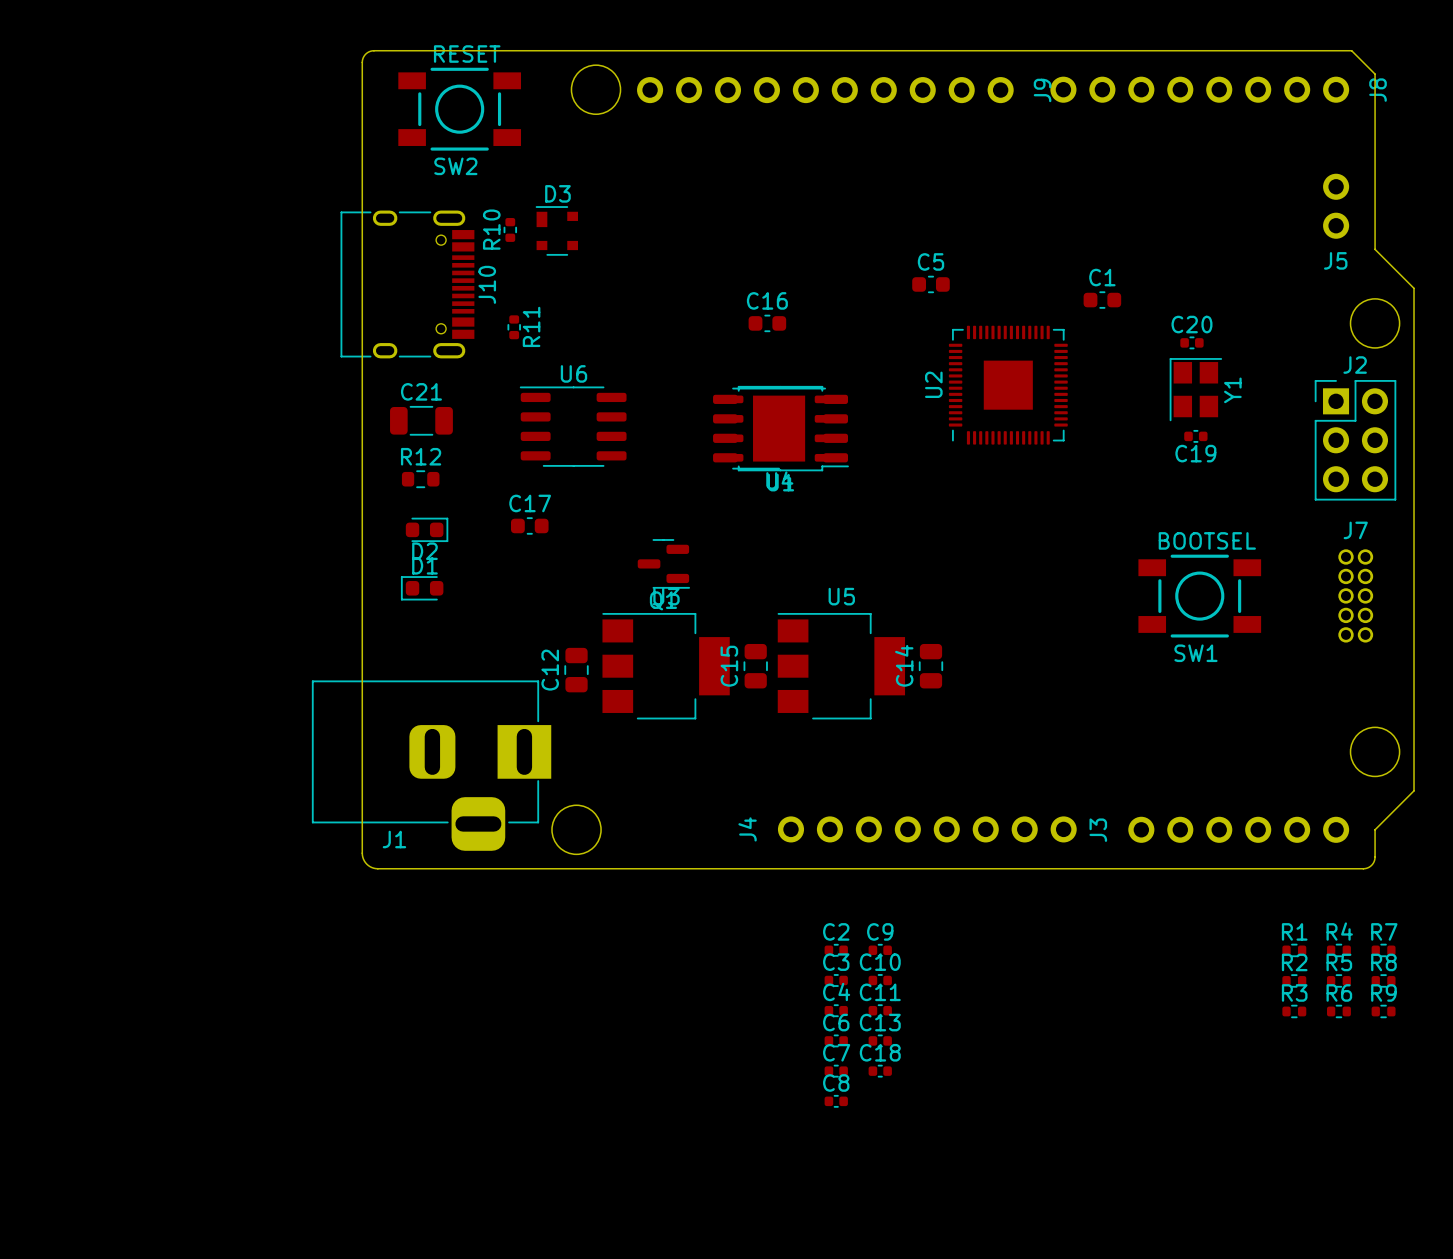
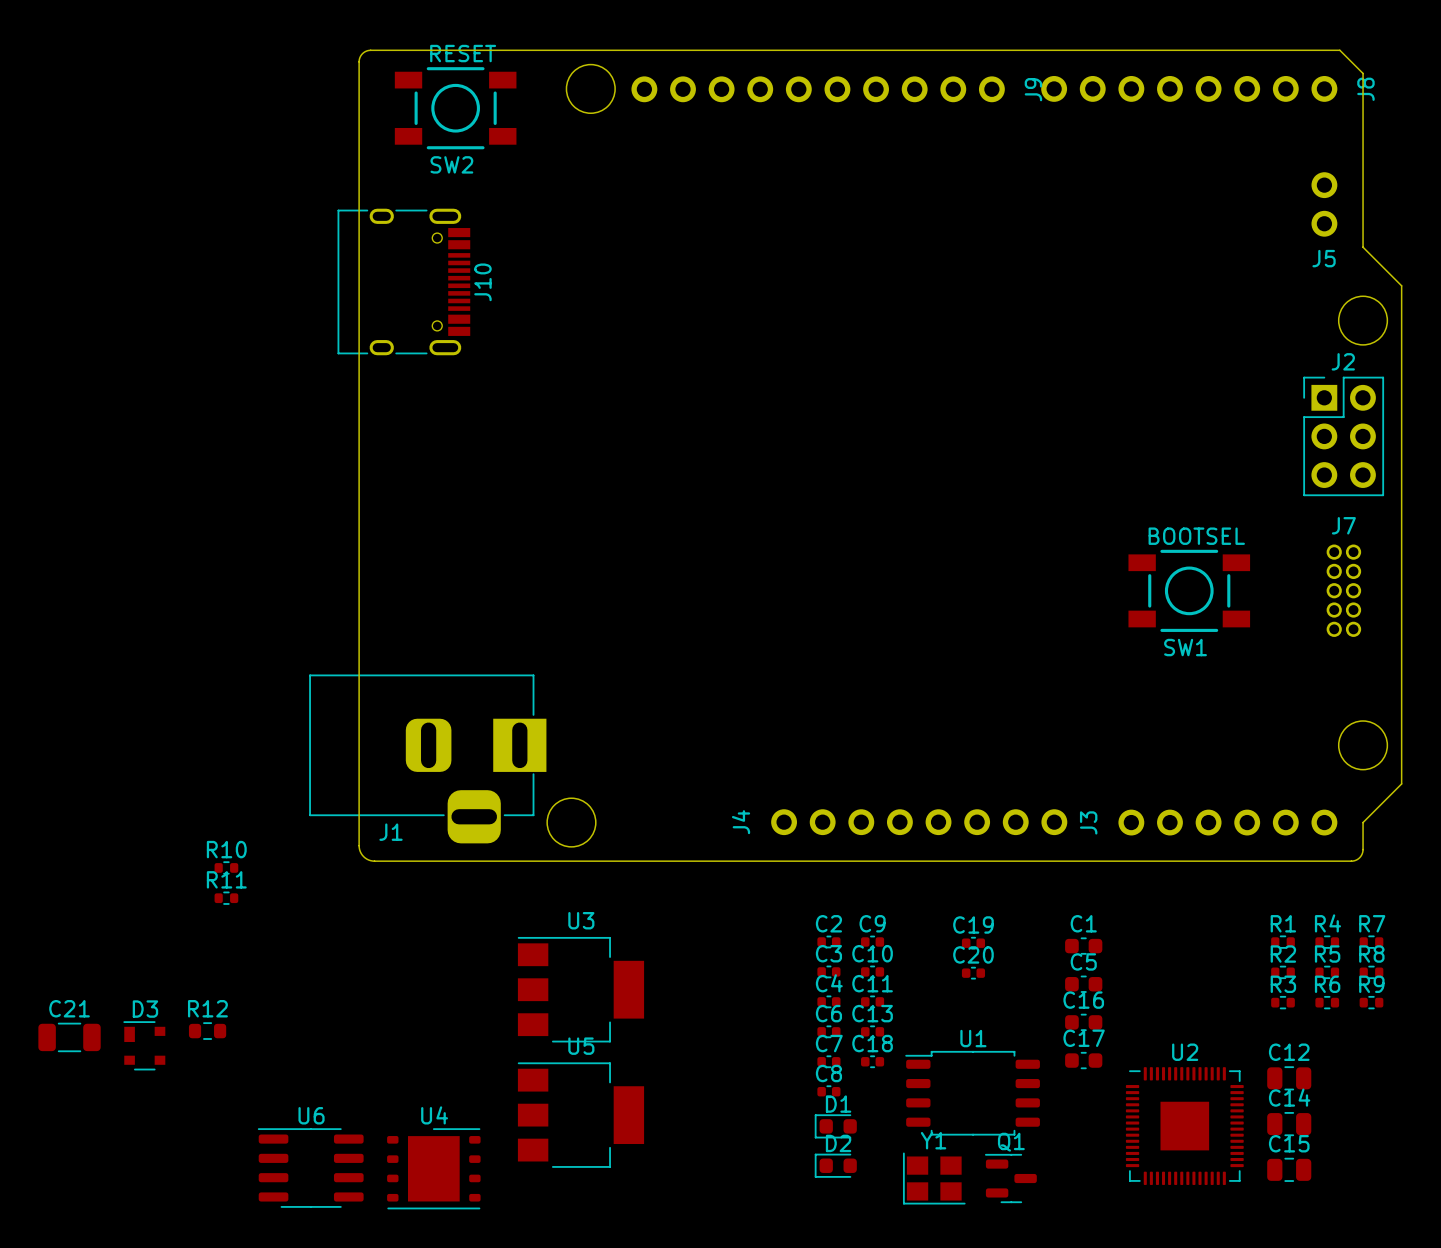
R10 rotation: 0° (510, 229) -> 90° clockwise (226, 867)
R10 position: (510, 229) -> (226, 867)
D3 position: (556, 230) -> (144, 1045)
C5 position: (930, 284) -> (1083, 984)
C1 position: (1102, 300) -> (1083, 946)
C16 position: (767, 323) -> (1083, 1022)
R11 rotation: 0° (514, 327) -> 90° clockwise (226, 898)
R11 position: (514, 327) -> (226, 898)
C20 position: (1191, 342) -> (973, 973)
U2 rotation: 0° (1008, 385) -> 90° clockwise (1184, 1126)
U2 position: (1008, 385) -> (1184, 1126)
Y1 rotation: 0° (1195, 389) -> 90° counterclockwise (934, 1178)
Y1 position: (1195, 389) -> (934, 1178)
C21 position: (421, 420) -> (69, 1037)
U6 position: (573, 426) -> (310, 1168)
U4 rotation: 0° (779, 428) -> 180° (433, 1168)
U4 position: (779, 428) -> (433, 1168)
U1 rotation: 0° (780, 428) -> 180° (972, 1093)
U1 position: (780, 428) -> (972, 1093)
C19 position: (1195, 436) -> (973, 943)
C19 name position: C19 (1195, 453) -> C19 (973, 924)
R12 position: (420, 479) -> (207, 1031)
C17 position: (529, 525) -> (1083, 1060)
D2 rotation: 0° (427, 529) -> 180° (835, 1165)
D2 position: (427, 529) -> (835, 1165)
Q1 rotation: 0° (663, 563) -> 180° (1010, 1178)
Q1 position: (663, 563) -> (1010, 1178)
D1 position: (422, 588) -> (835, 1126)
U3 position: (666, 666) -> (580, 989)
C15 rotation: 0° (755, 666) -> 90° clockwise (1289, 1169)
C15 position: (755, 666) -> (1289, 1169)
U5 position: (841, 666) -> (580, 1115)
C14 rotation: 0° (930, 666) -> 90° clockwise (1289, 1124)
C14 position: (930, 666) -> (1289, 1124)
C12 rotation: 0° (576, 670) -> 90° clockwise (1289, 1078)
C12 position: (576, 670) -> (1289, 1078)

